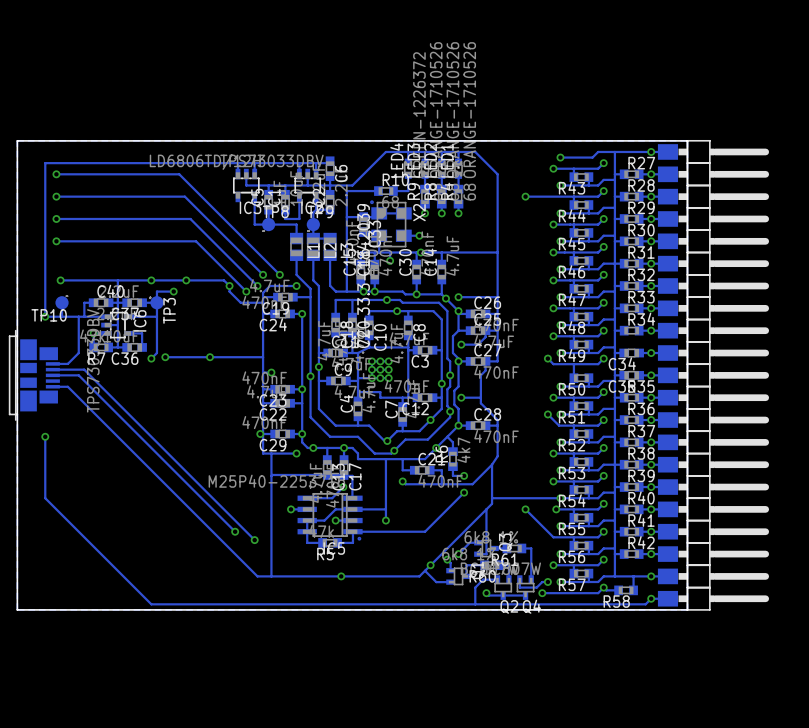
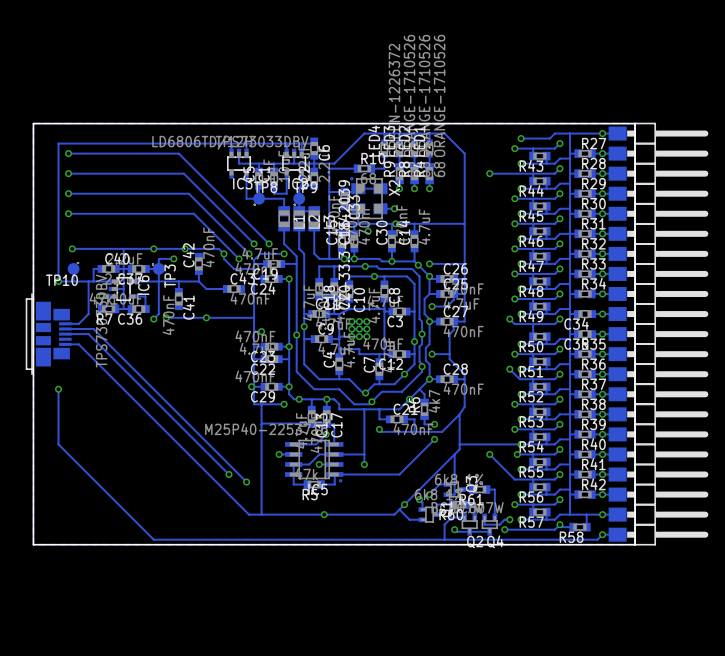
C42: none -> 470nF (198, 263)
track: none -> (198, 270) (198, 281)
track: none -> (178, 281) (178, 292)
track: none -> (198, 281) (158, 281)
track: none -> (198, 281) (206, 288) (227, 288)
C43: none -> 470nF (234, 288)
C41: none -> 470nF (178, 299)

